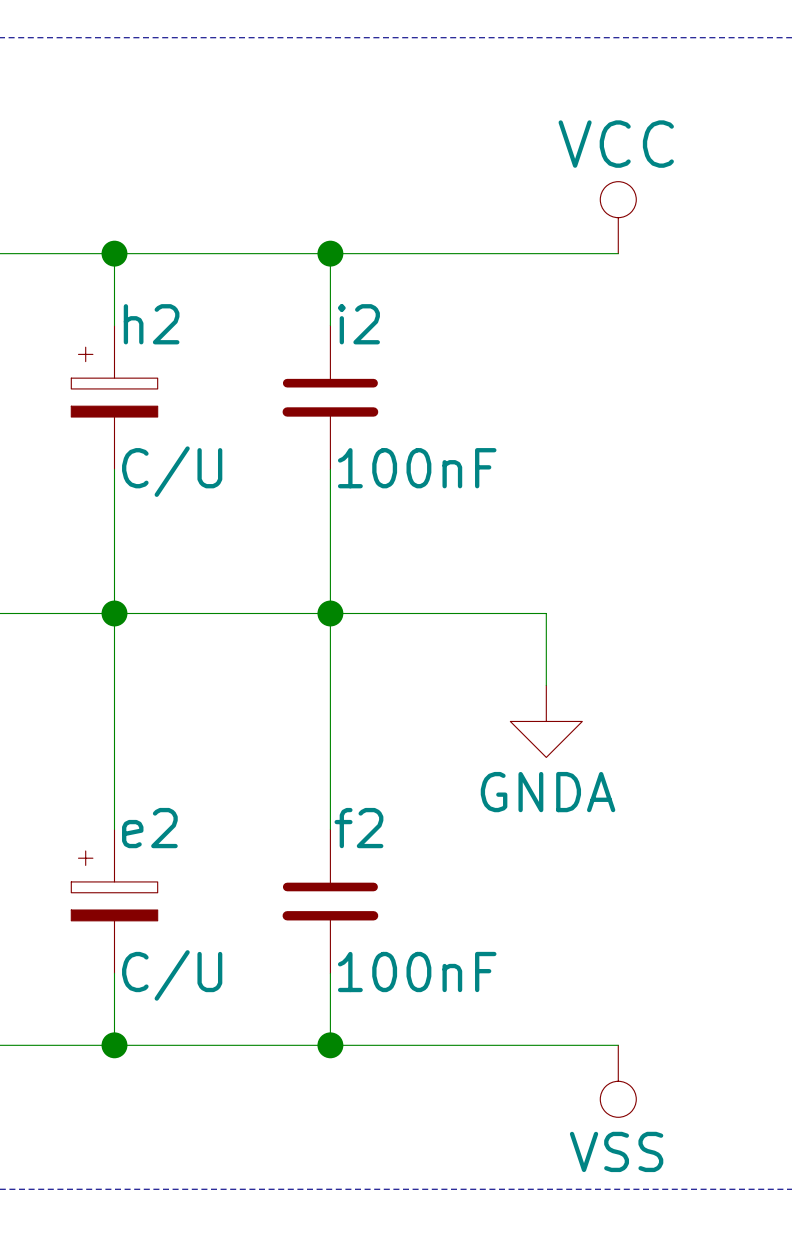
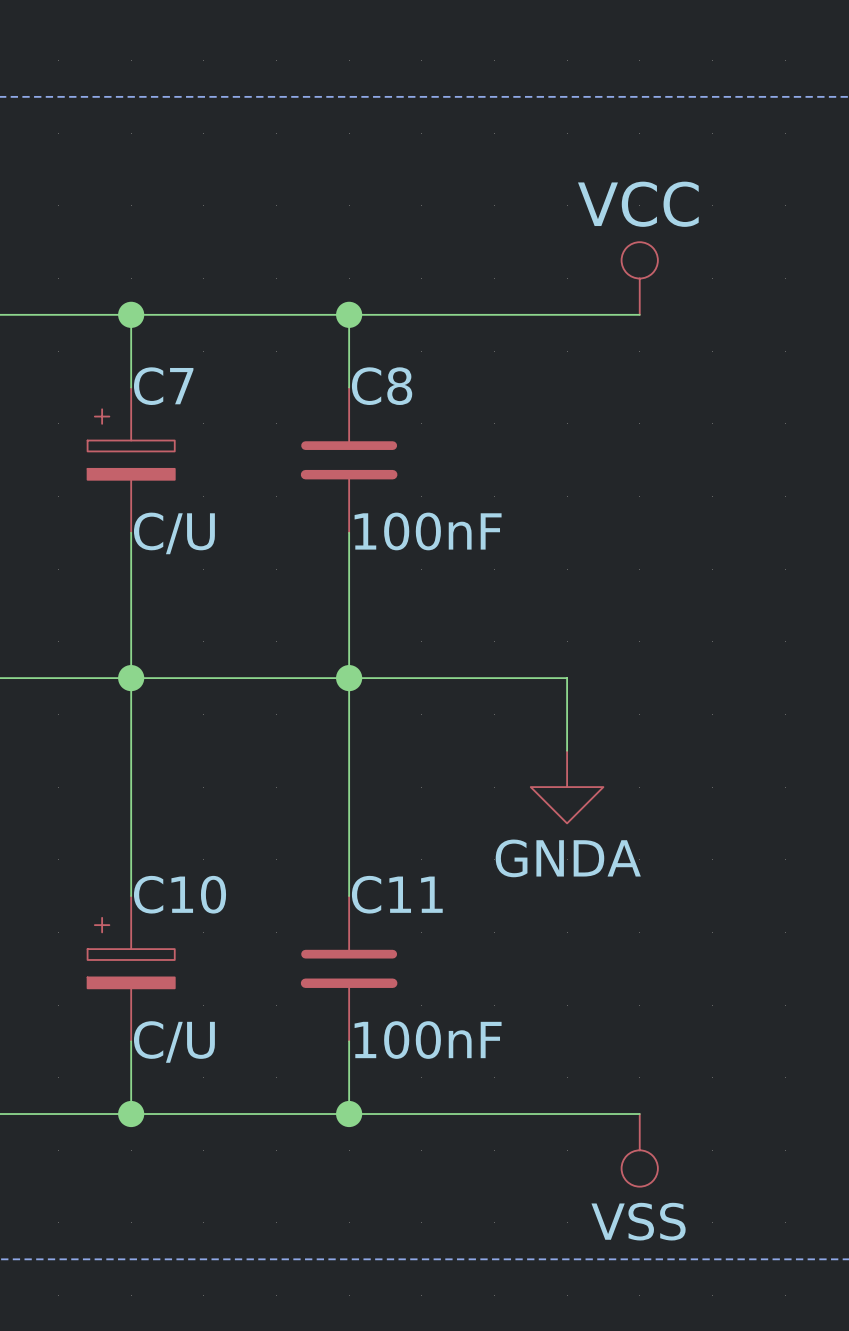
h2 name: h2 (151, 324) -> C7 (163, 386)
i2 name: i2 (358, 324) -> C8 (382, 386)
e2 name: e2 (149, 828) -> C10 (180, 894)
f2 name: f2 (358, 828) -> C11 (397, 894)

